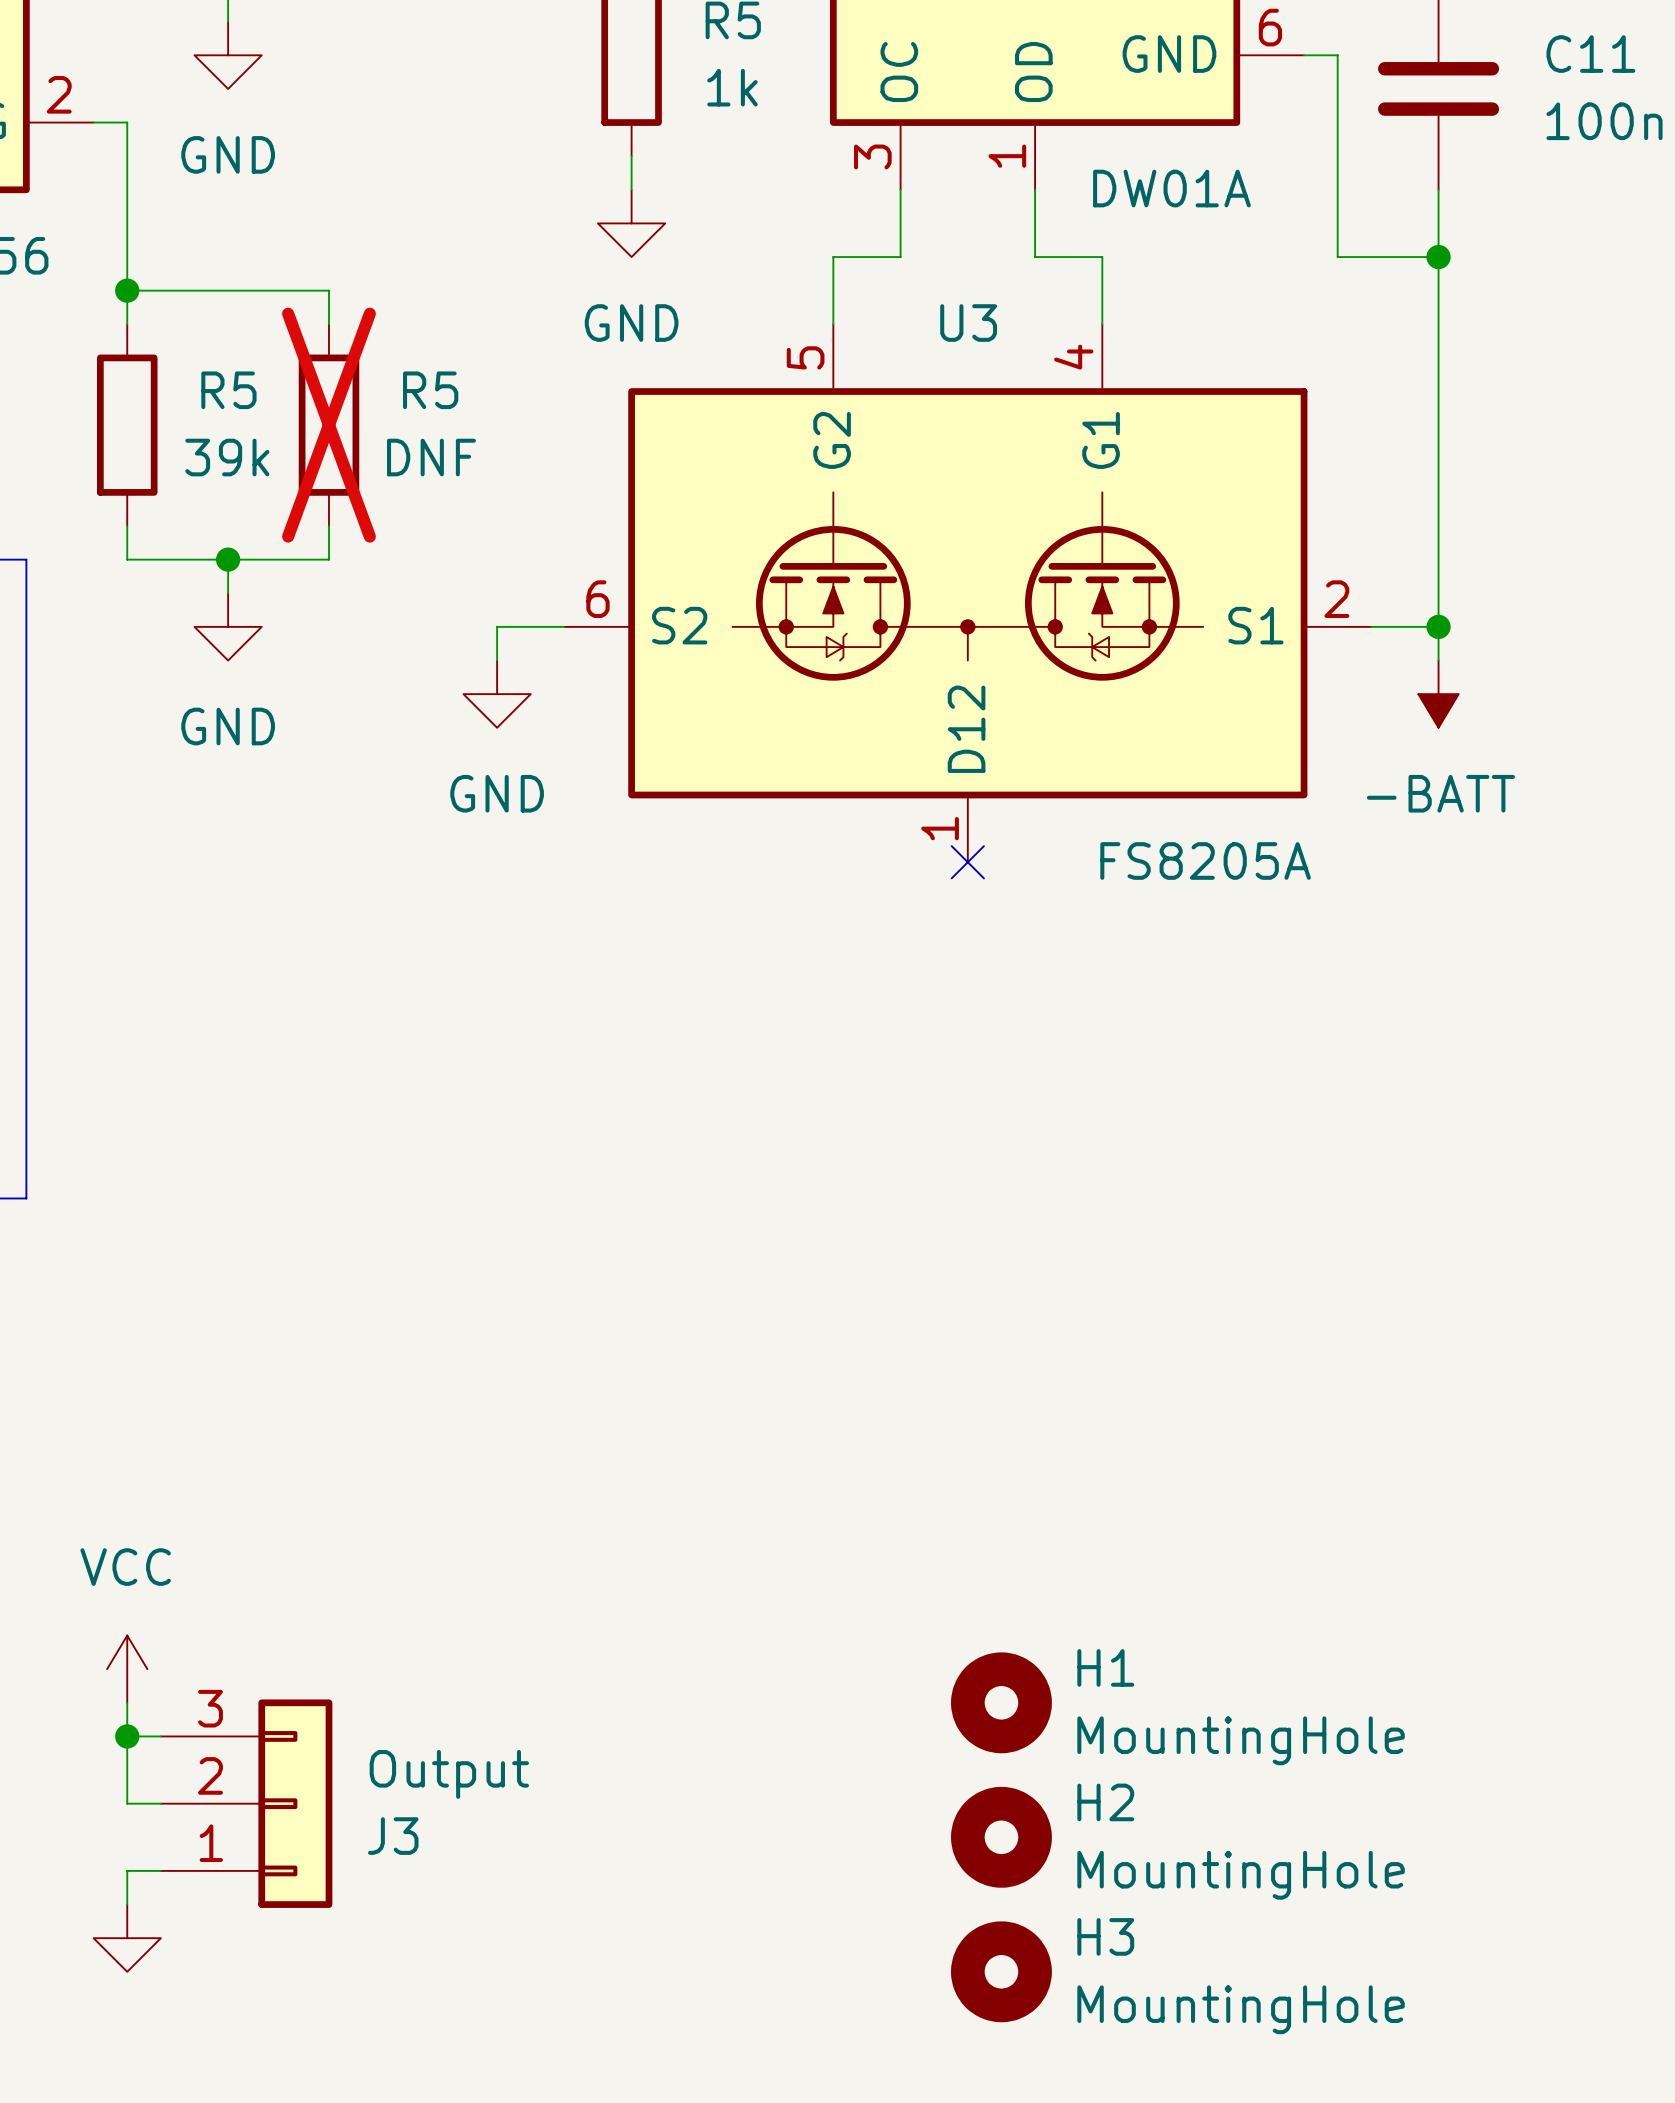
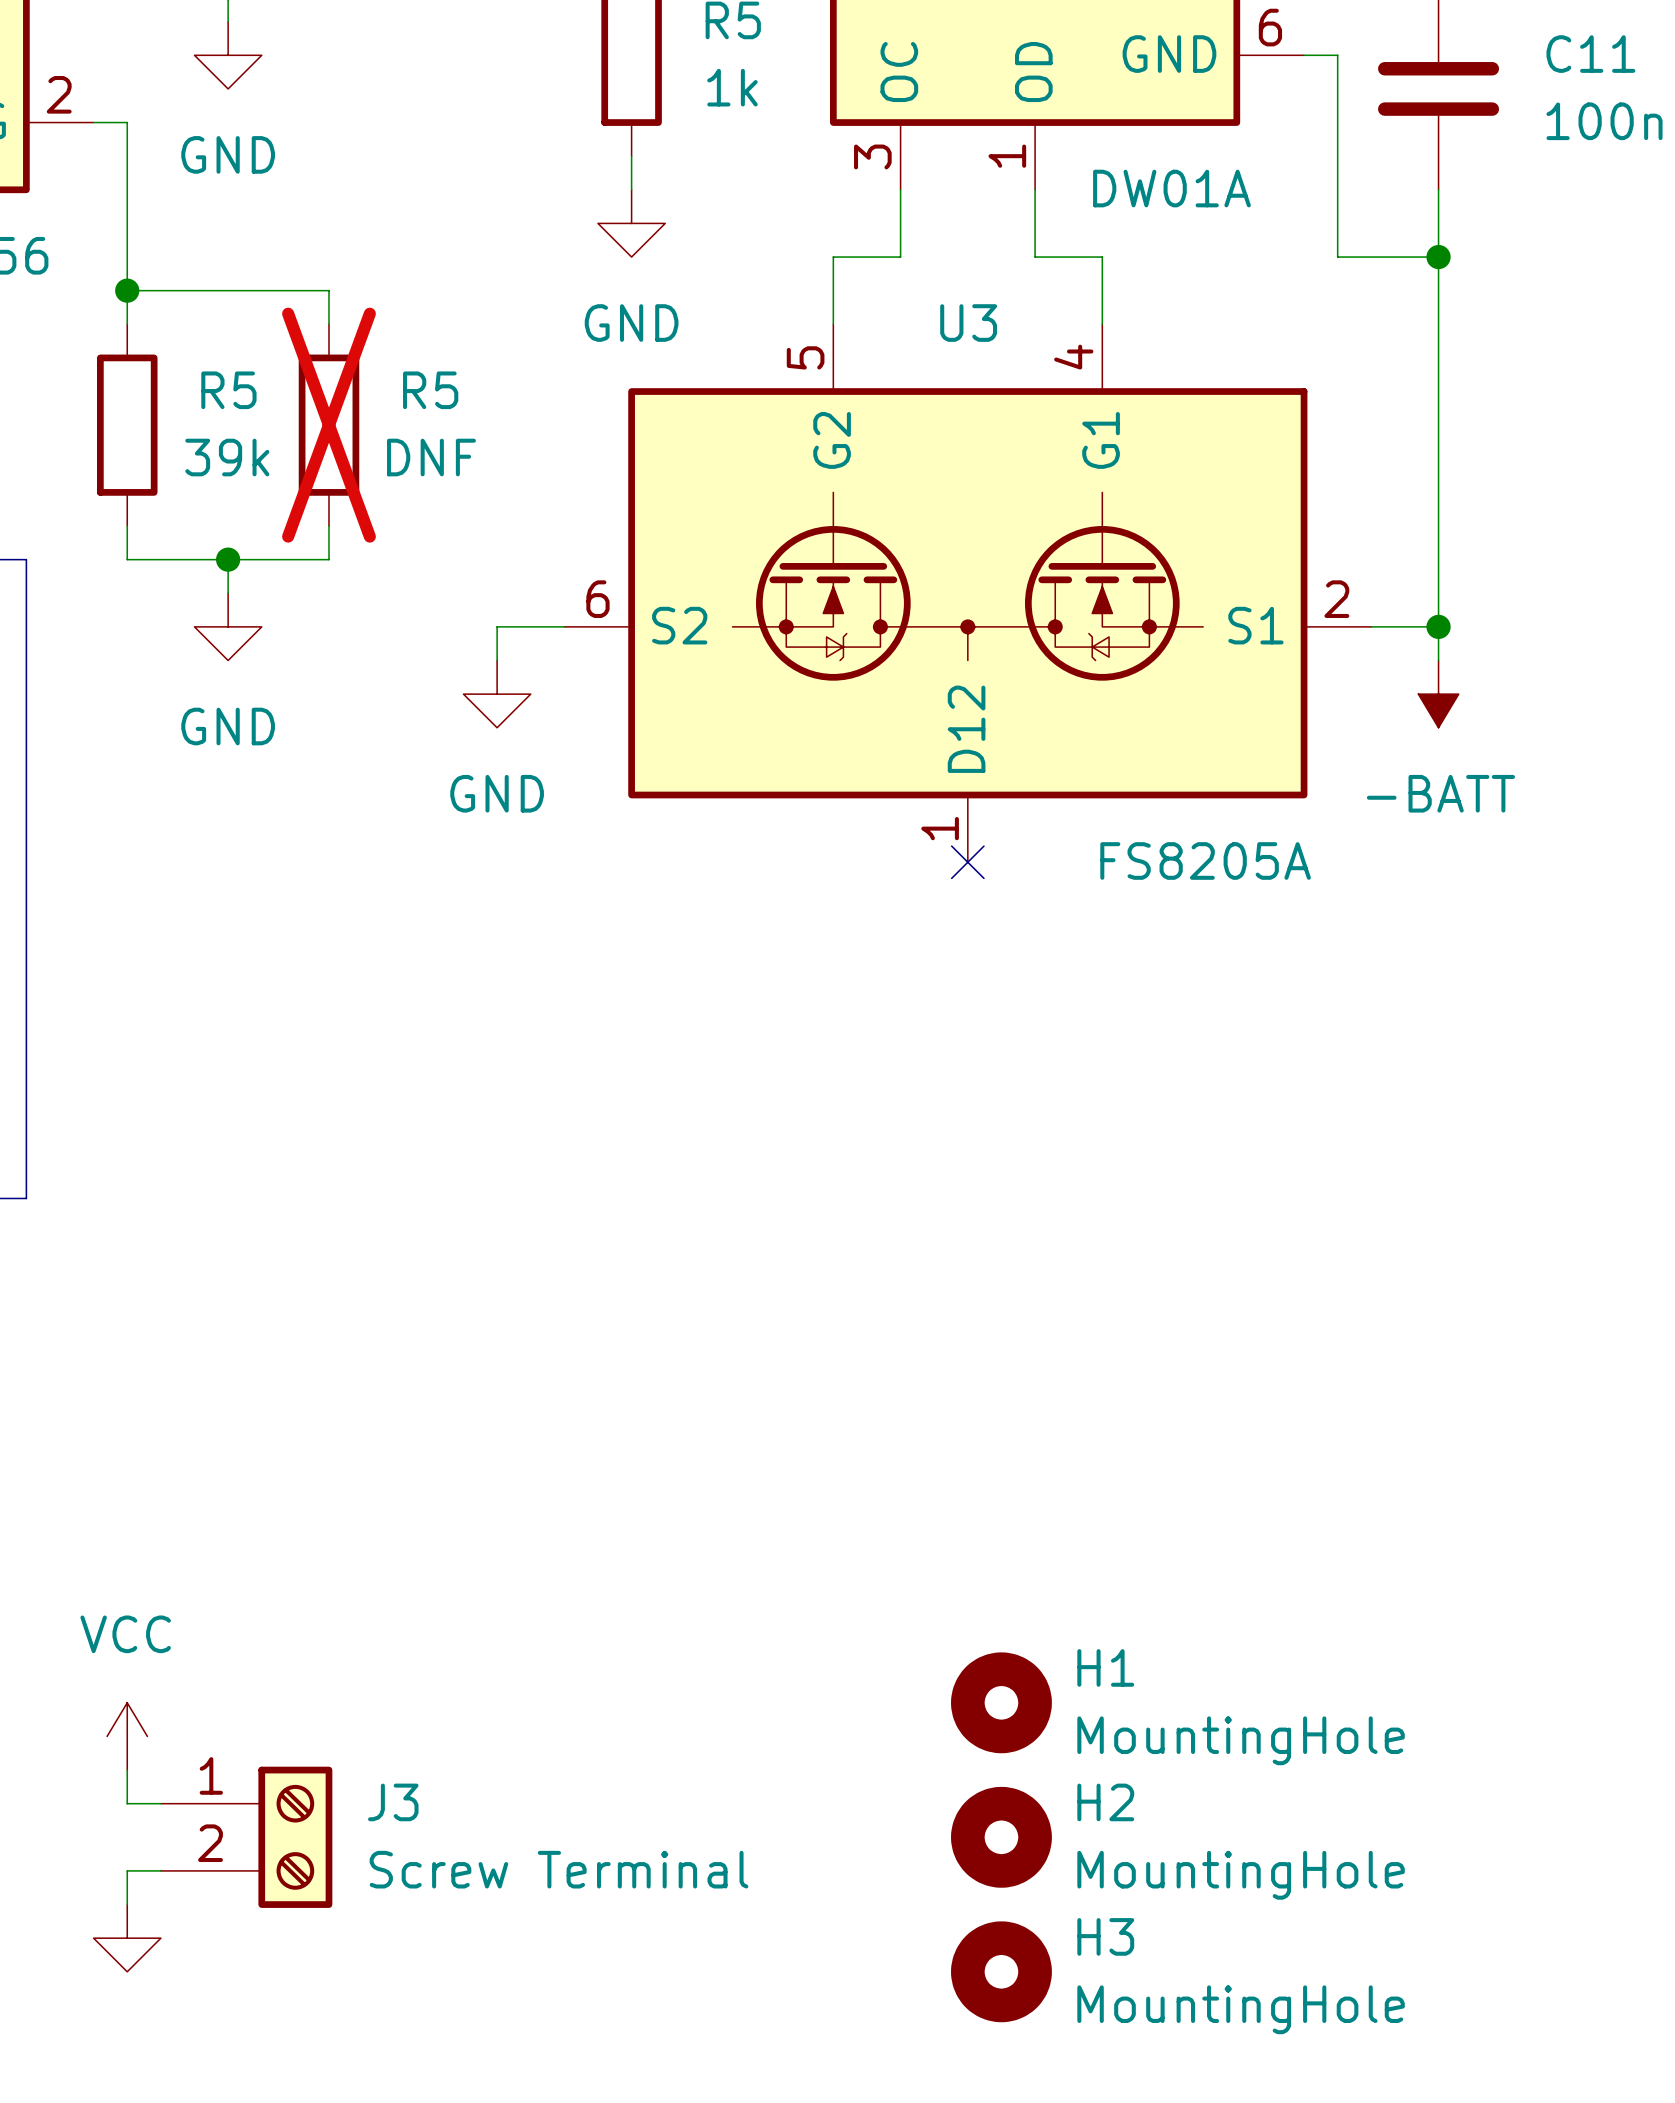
power symbol position: VCC (127, 1669) -> VCC (127, 1736)
J3 symbol: [160, 1699, 333, 1908] -> [160, 1766, 333, 1908]
wire: (127, 1736) (160, 1736) -> none
junction: (127, 1736) -> none
J3 value: Output (449, 1774) -> Screw Terminal (559, 1869)
J3 name position: J3 (393, 1836) -> J3 (393, 1802)

